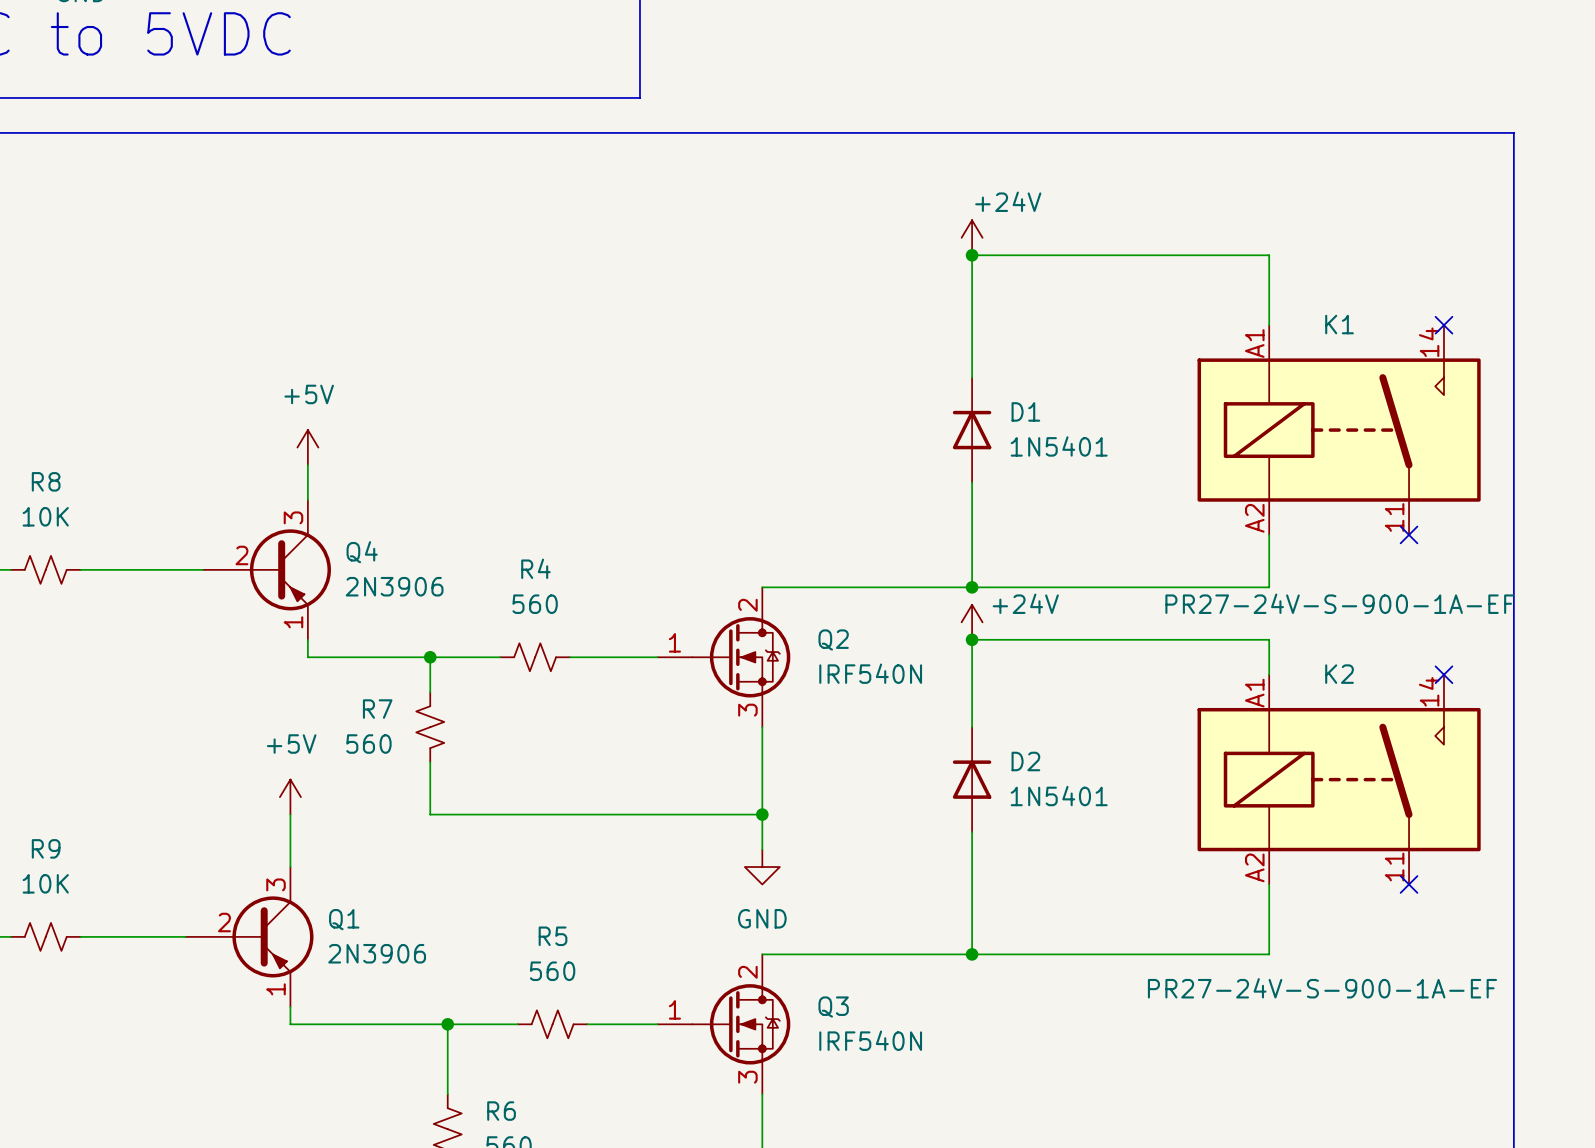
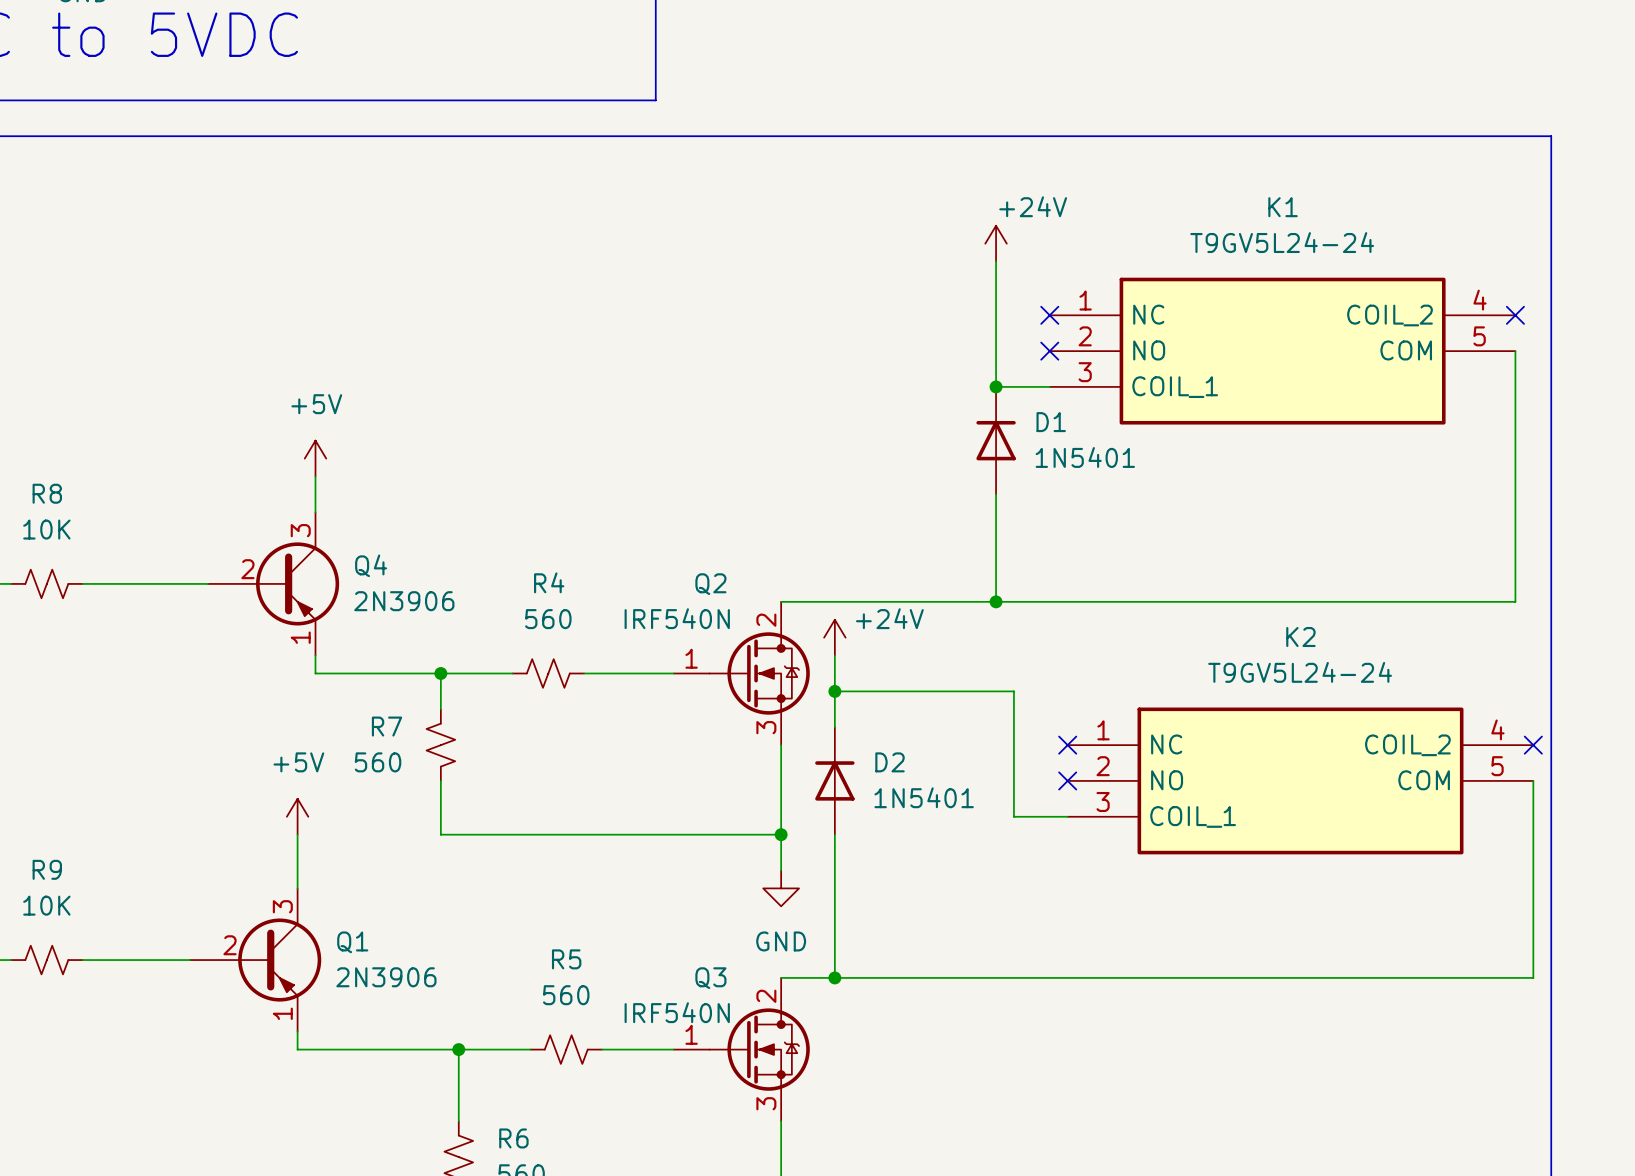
wire: (972, 255) (1269, 255) (1269, 325) -> none
junction: (972, 255) -> none
no-connect mark: none -> (1049, 315)
K1 name position: K1 (1339, 324) -> K1 (1283, 207)
K1 symbol: [1197, 325, 1481, 535] -> [1049, 277, 1516, 425]
no-connect mark position: (1443, 325) -> (1515, 315)
no-connect mark: none -> (1049, 351)
wire: none -> (996, 386) (1049, 386)
junction: none -> (996, 386)
wire: (1269, 534) (1269, 587) -> (1515, 351) (1515, 601) (1300, 601)
no-connect mark: (1409, 534) -> none
K1 value: PR27-24V-S-900-1A-EF (1339, 603) -> T9GV5L24-24 (1282, 242)
power symbol position: +24V (972, 622) -> +24V (834, 637)
wire: none -> (834, 655) (834, 727)
Q2 name position: Q2 (833, 639) -> Q2 (710, 584)
junction: (972, 639) -> none
Q2 value position: IRF540N (870, 673) -> IRF540N (677, 618)
wire: none -> (834, 691) (1013, 691) (1013, 816) (1067, 816)
junction: none -> (834, 691)
K2 symbol: [1197, 674, 1481, 885] -> [1067, 707, 1534, 855]
wire: (1269, 674) (1269, 639) (972, 639) (972, 727) -> none
K2 name position: K2 (1339, 674) -> K2 (1300, 637)
no-connect mark position: (1443, 674) -> (1533, 745)
no-connect mark: none -> (1067, 745)
no-connect mark: none -> (1067, 780)
D2 position: (972, 779) -> (834, 780)
wire: none -> (834, 834) (834, 977)
wire: (972, 832) (972, 954) -> none
wire: (1269, 884) (1269, 954) -> (1533, 780) (1533, 977) (1300, 977)
no-connect mark: (1409, 884) -> none
junction: none -> (834, 977)
junction: (972, 954) -> none
K2 value: PR27-24V-S-900-1A-EF (1322, 988) -> T9GV5L24-24 (1300, 672)
Q3 name position: Q3 (833, 1007) -> Q3 (710, 978)
Q3 value position: IRF540N (870, 1040) -> IRF540N (677, 1012)

